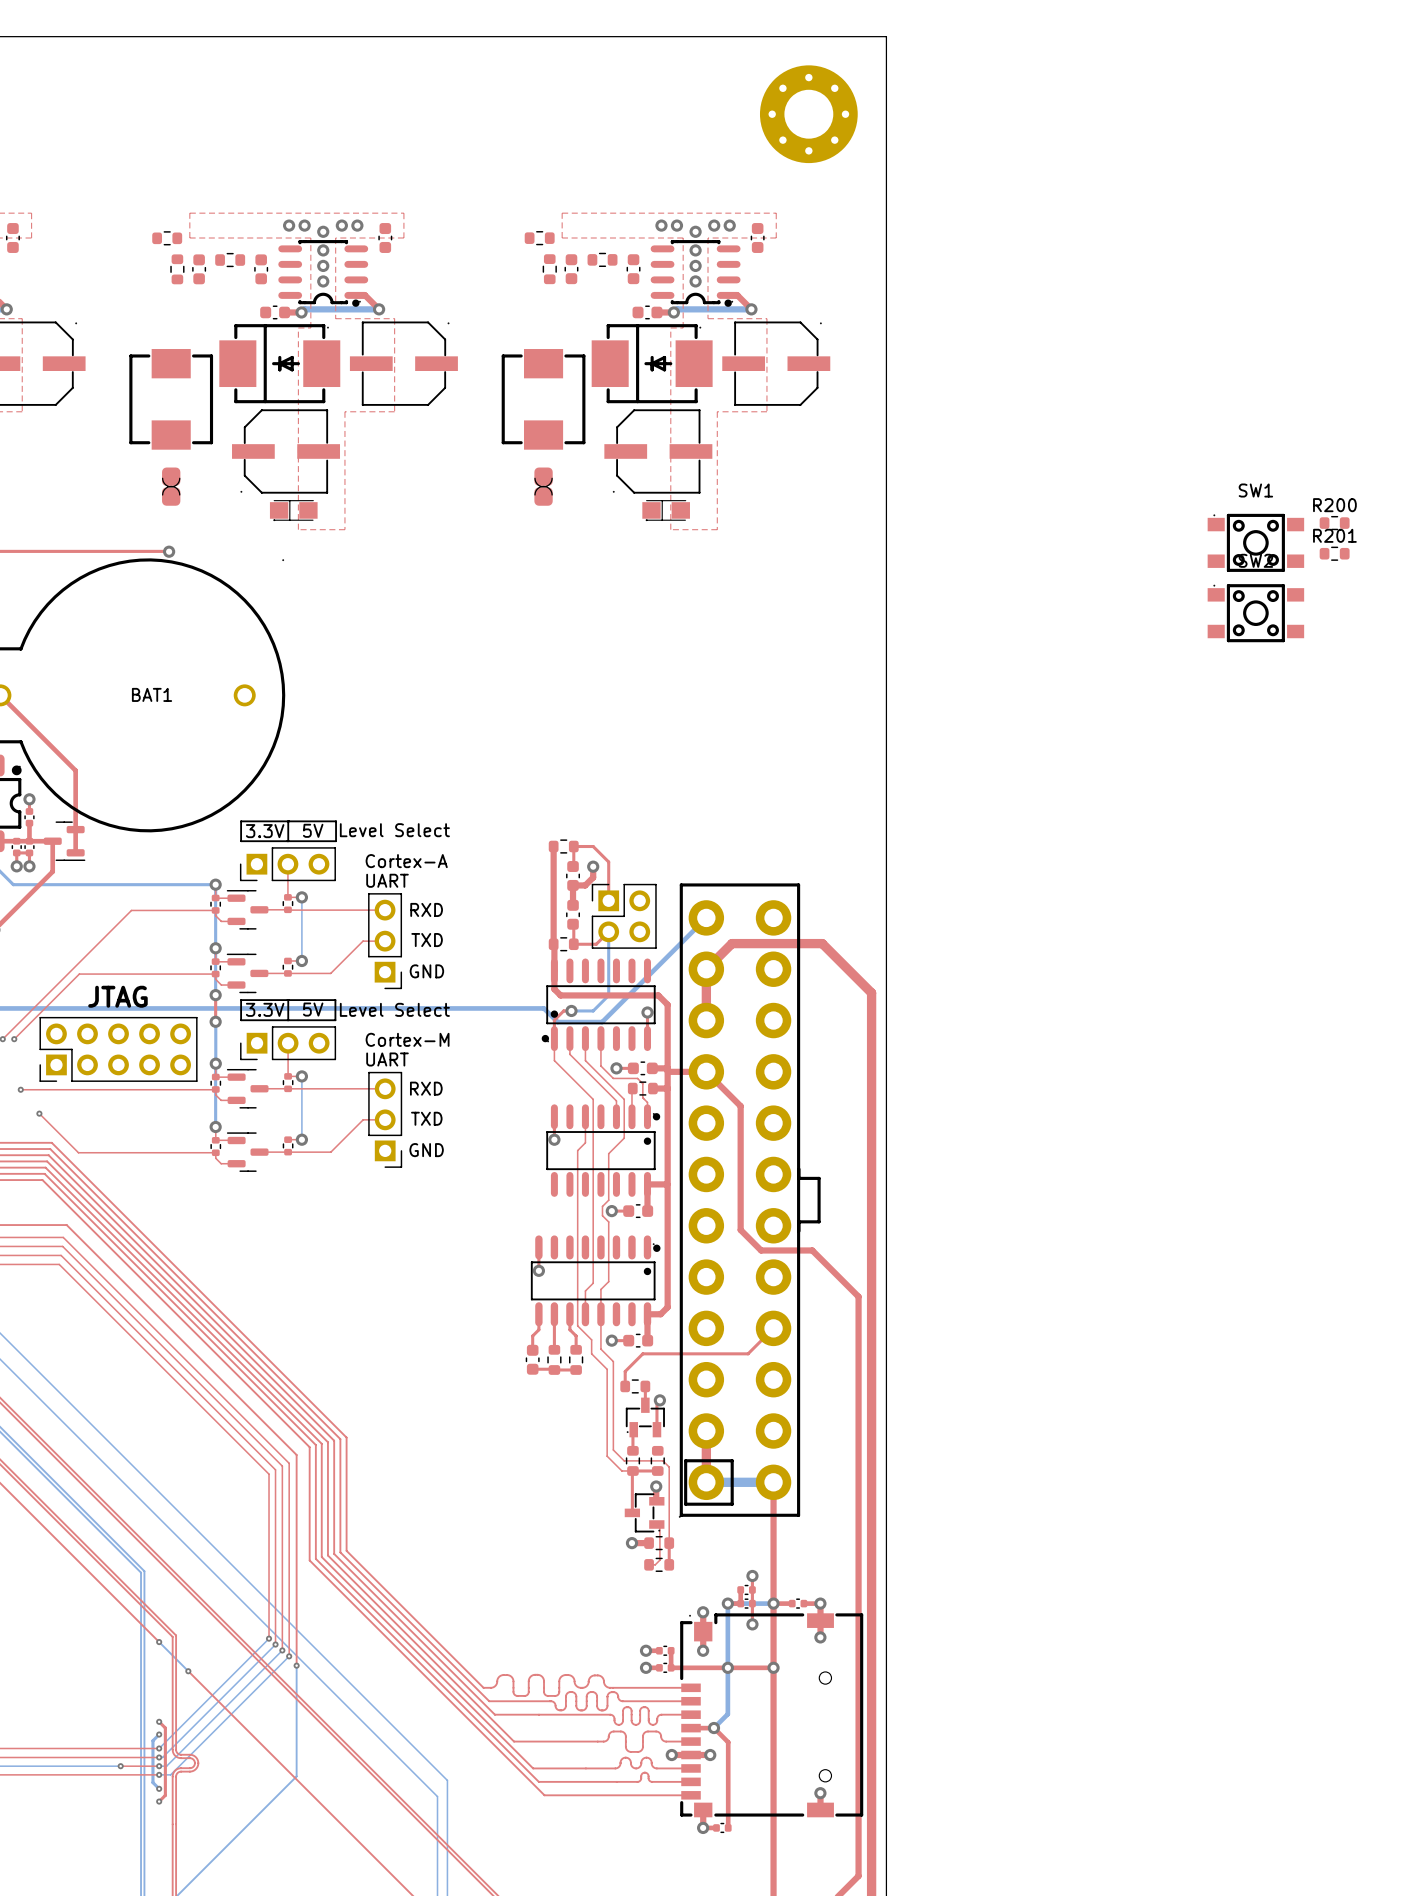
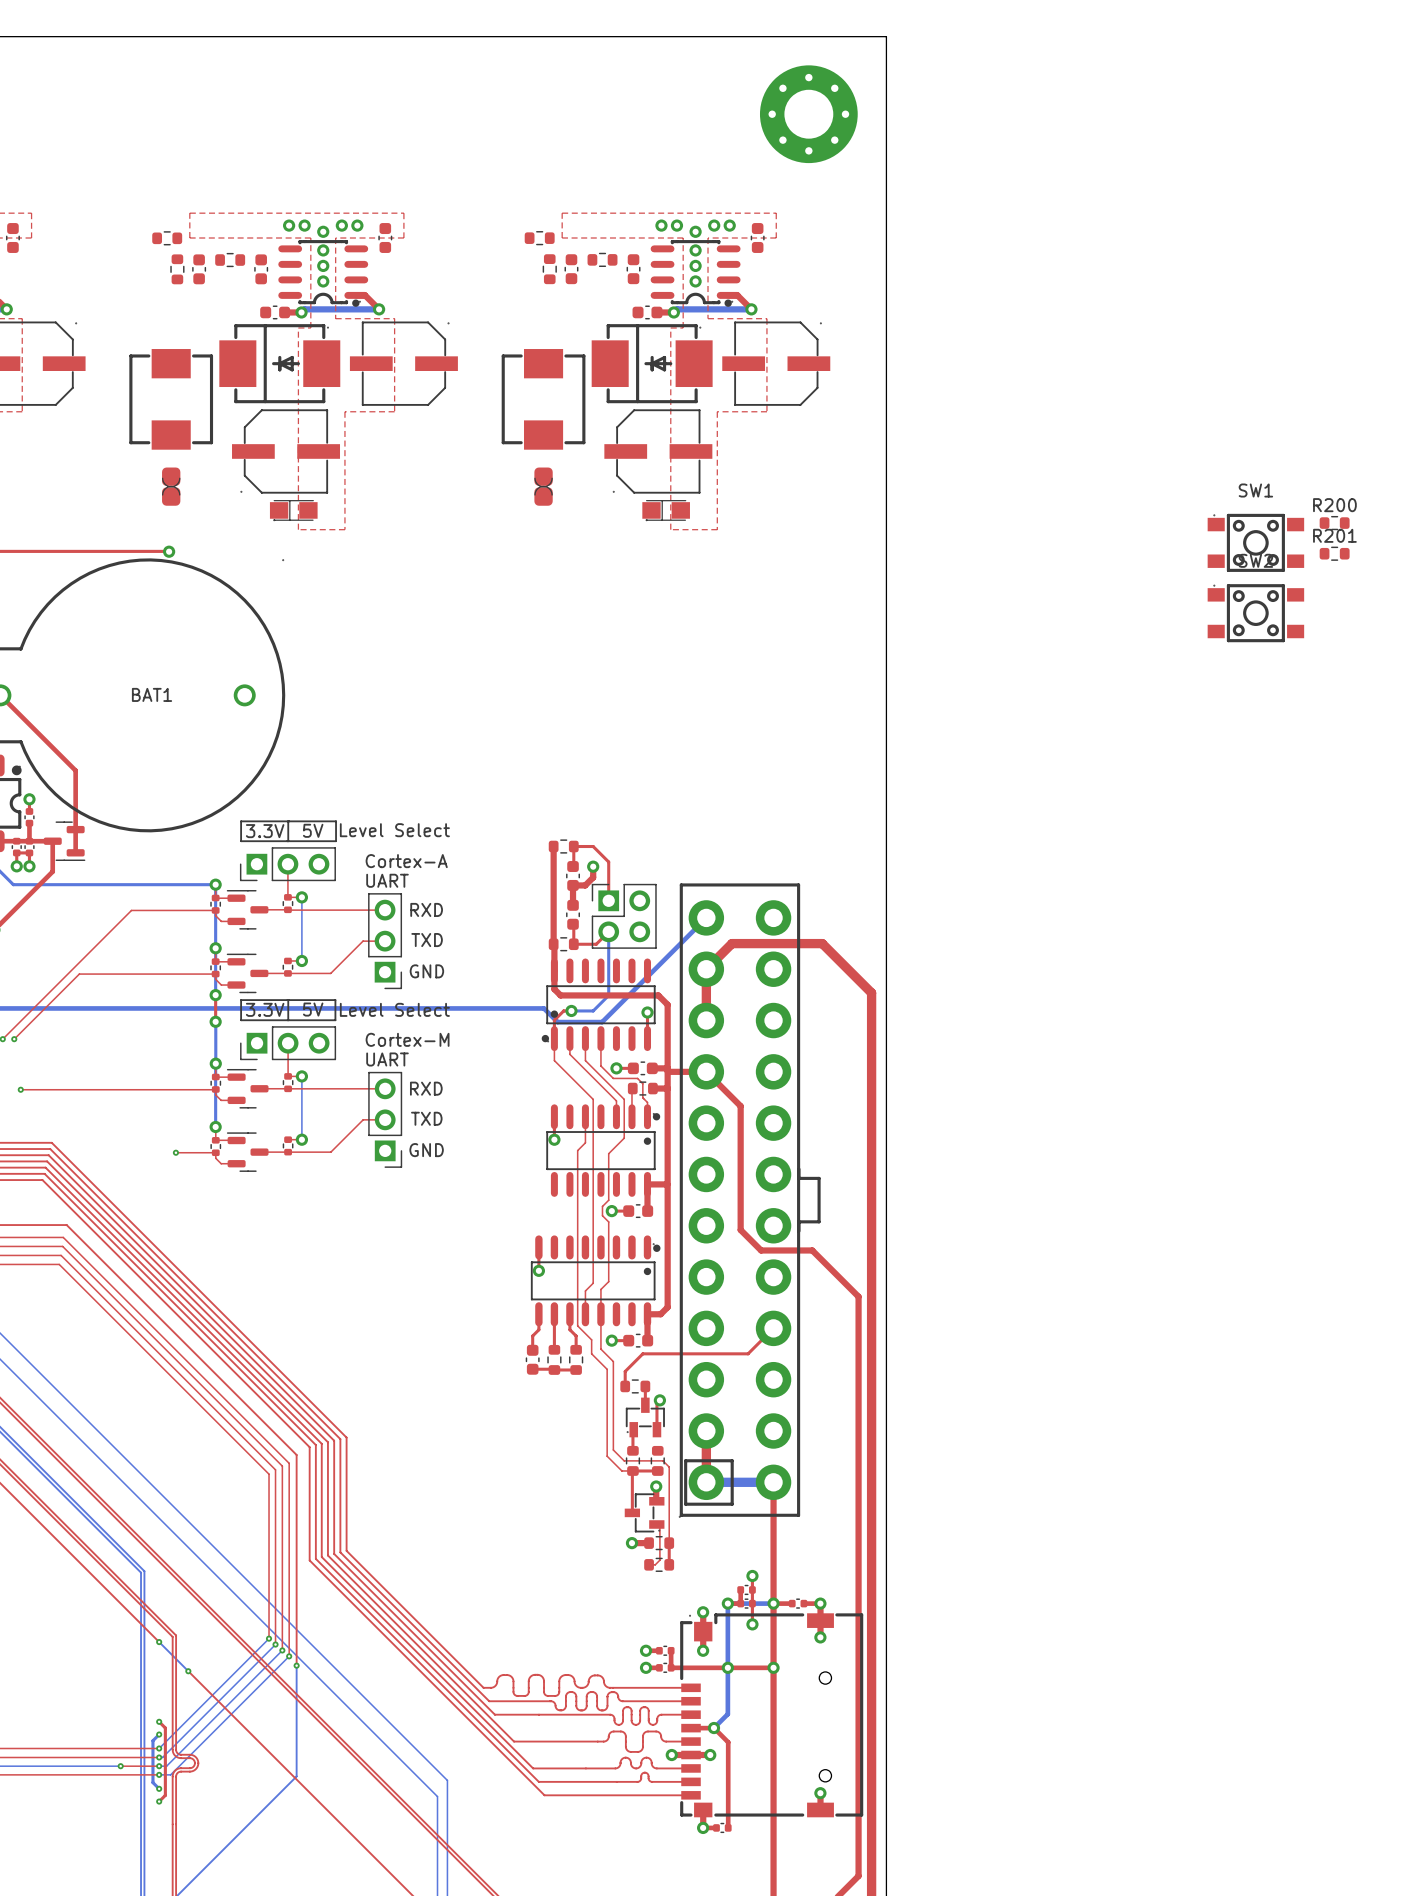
text: JTAG (117, 996) -> none
part: (118, 1049) -> none
top track: (39, 1113) (78, 1152) (175, 1152) -> none
via: (39, 1113) -> none
via: none -> (175, 1152)

